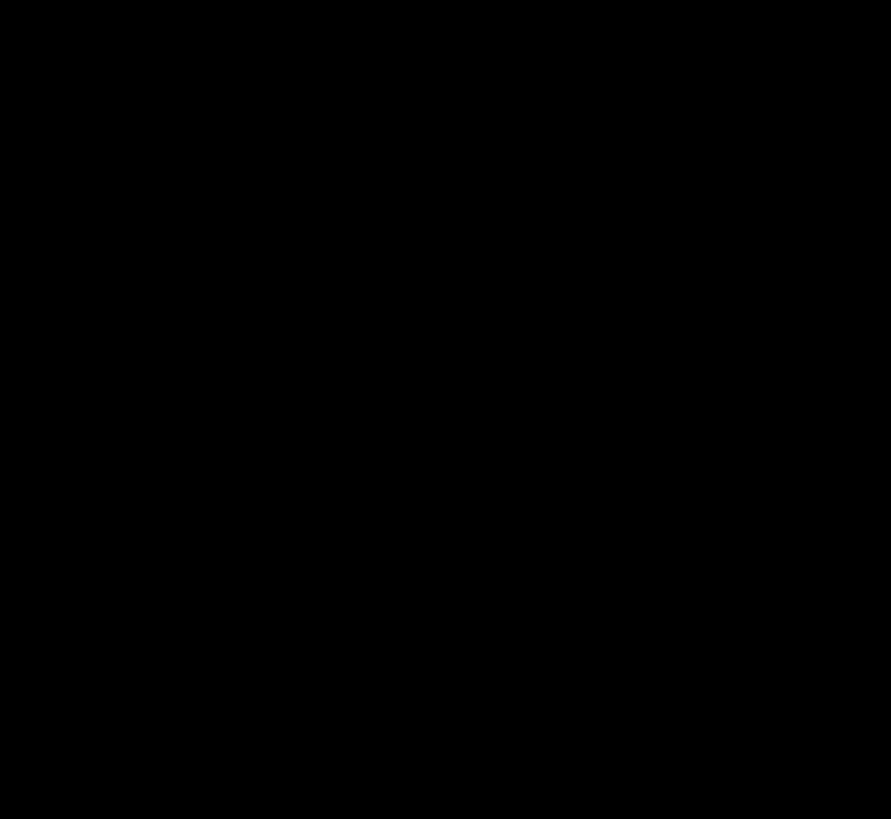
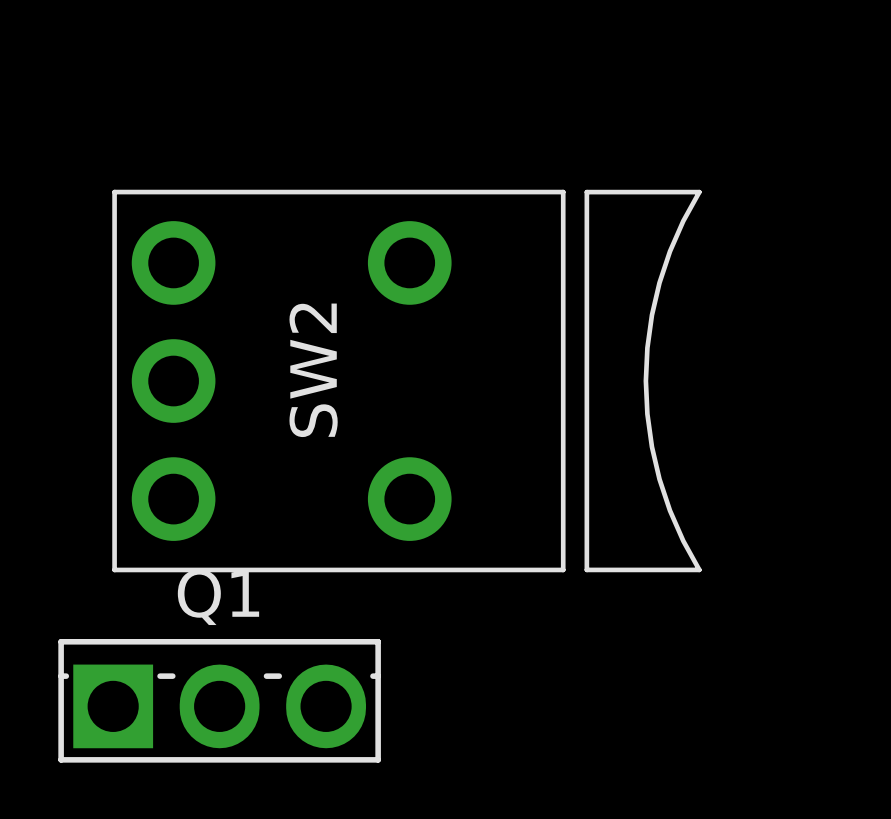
SW2: none -> (406, 381)
Q1: none -> (219, 700)

